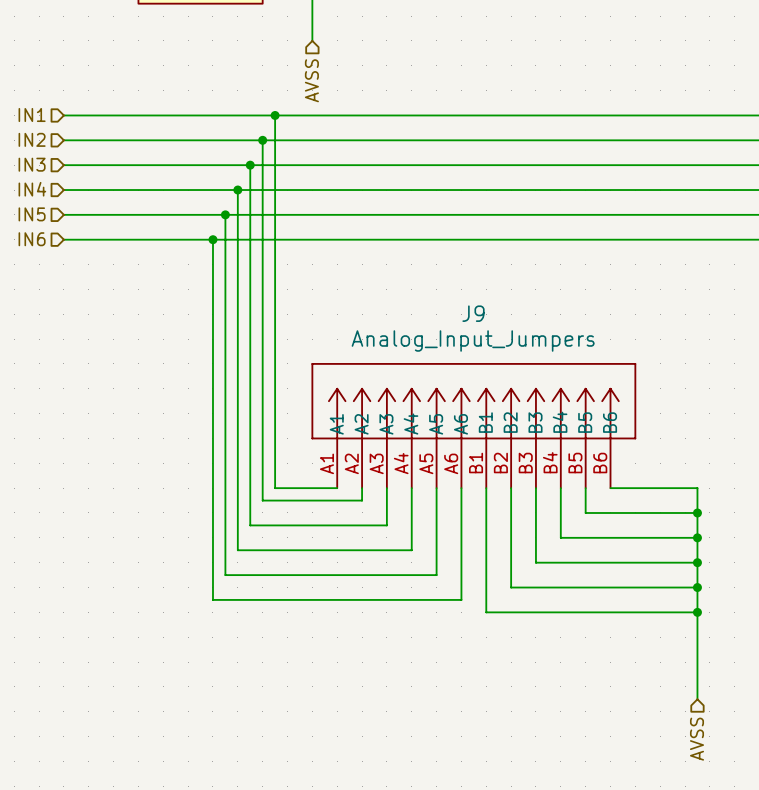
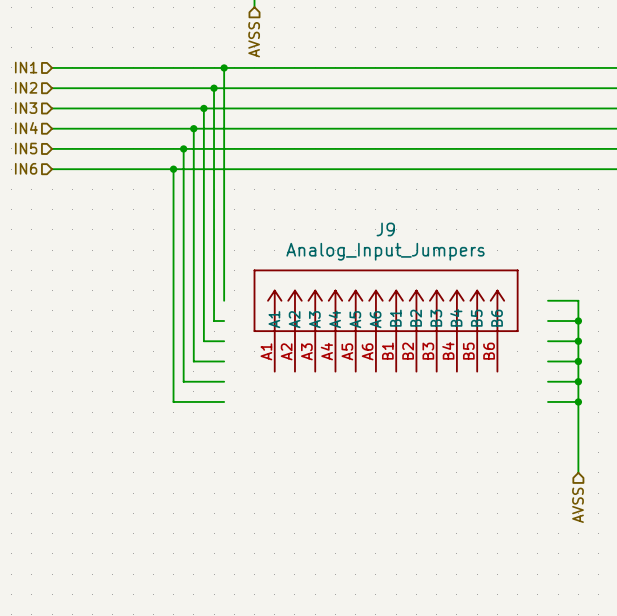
wire: (275, 401) (275, 488) (337, 488) -> none
wire: none -> (548, 300) (578, 300) (578, 472)
wire: (262, 426) (262, 500) -> (214, 321) (224, 321)
wire: none -> (548, 321) (578, 321)
junction: none -> (578, 321)
wire: (250, 450) (250, 525) -> (203, 341) (224, 341)
wire: none -> (548, 341) (578, 341)
junction: none -> (578, 341)
wire: (237, 475) (237, 550) (411, 550) (411, 488) -> (193, 361) (224, 361)
wire: none -> (548, 361) (578, 361)
junction: none -> (578, 361)
wire: (362, 488) (362, 500) (275, 500) -> none
wire: (386, 488) (386, 525) (275, 525) -> none
wire: (436, 488) (436, 575) (225, 575) (225, 500) -> (214, 381) (183, 381)
wire: (461, 488) (461, 599) (212, 599) (212, 525) -> (203, 401) (173, 401)
wire: (486, 488) (486, 612) (697, 612) -> none
wire: (511, 488) (511, 587) (697, 587) -> none
wire: (535, 488) (535, 562) (697, 562) -> none
wire: (560, 488) (560, 537) (697, 537) -> none
wire: (585, 488) (585, 512) (697, 512) -> none
wire: (610, 488) (697, 488) (697, 699) -> none
wire: none -> (548, 381) (578, 381)
junction: none -> (578, 381)
junction: (697, 512) -> none
wire: none -> (548, 401) (578, 401)
junction: none -> (578, 401)
junction: (697, 537) -> none
junction: (697, 562) -> none
junction: (697, 587) -> none
junction: (697, 612) -> none
hierarchical label position: AVSS (696, 739) -> AVSS (578, 505)

